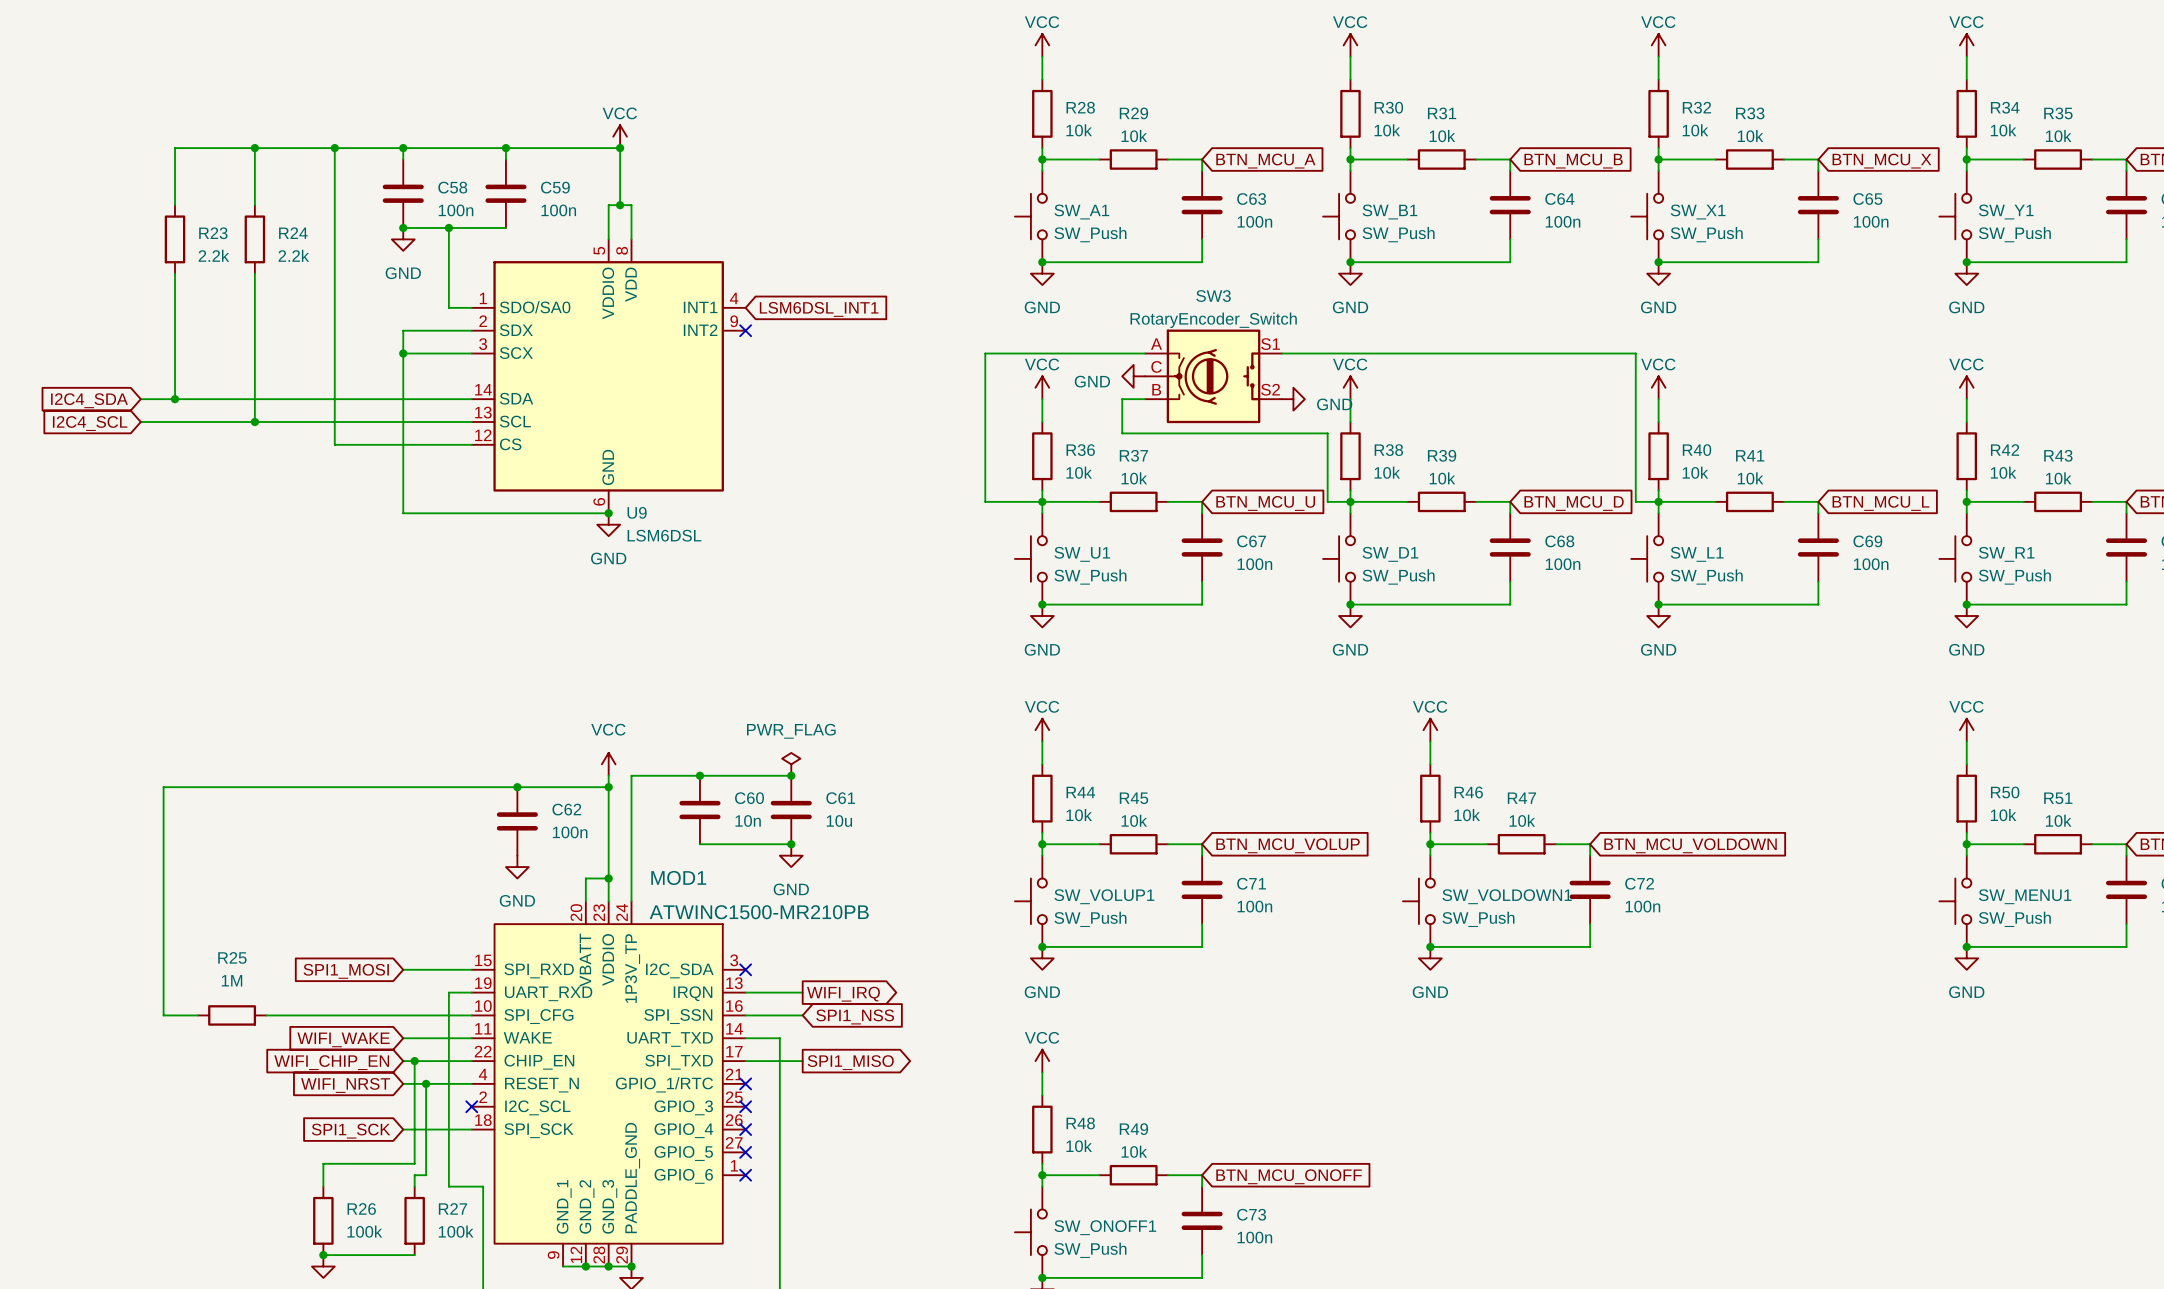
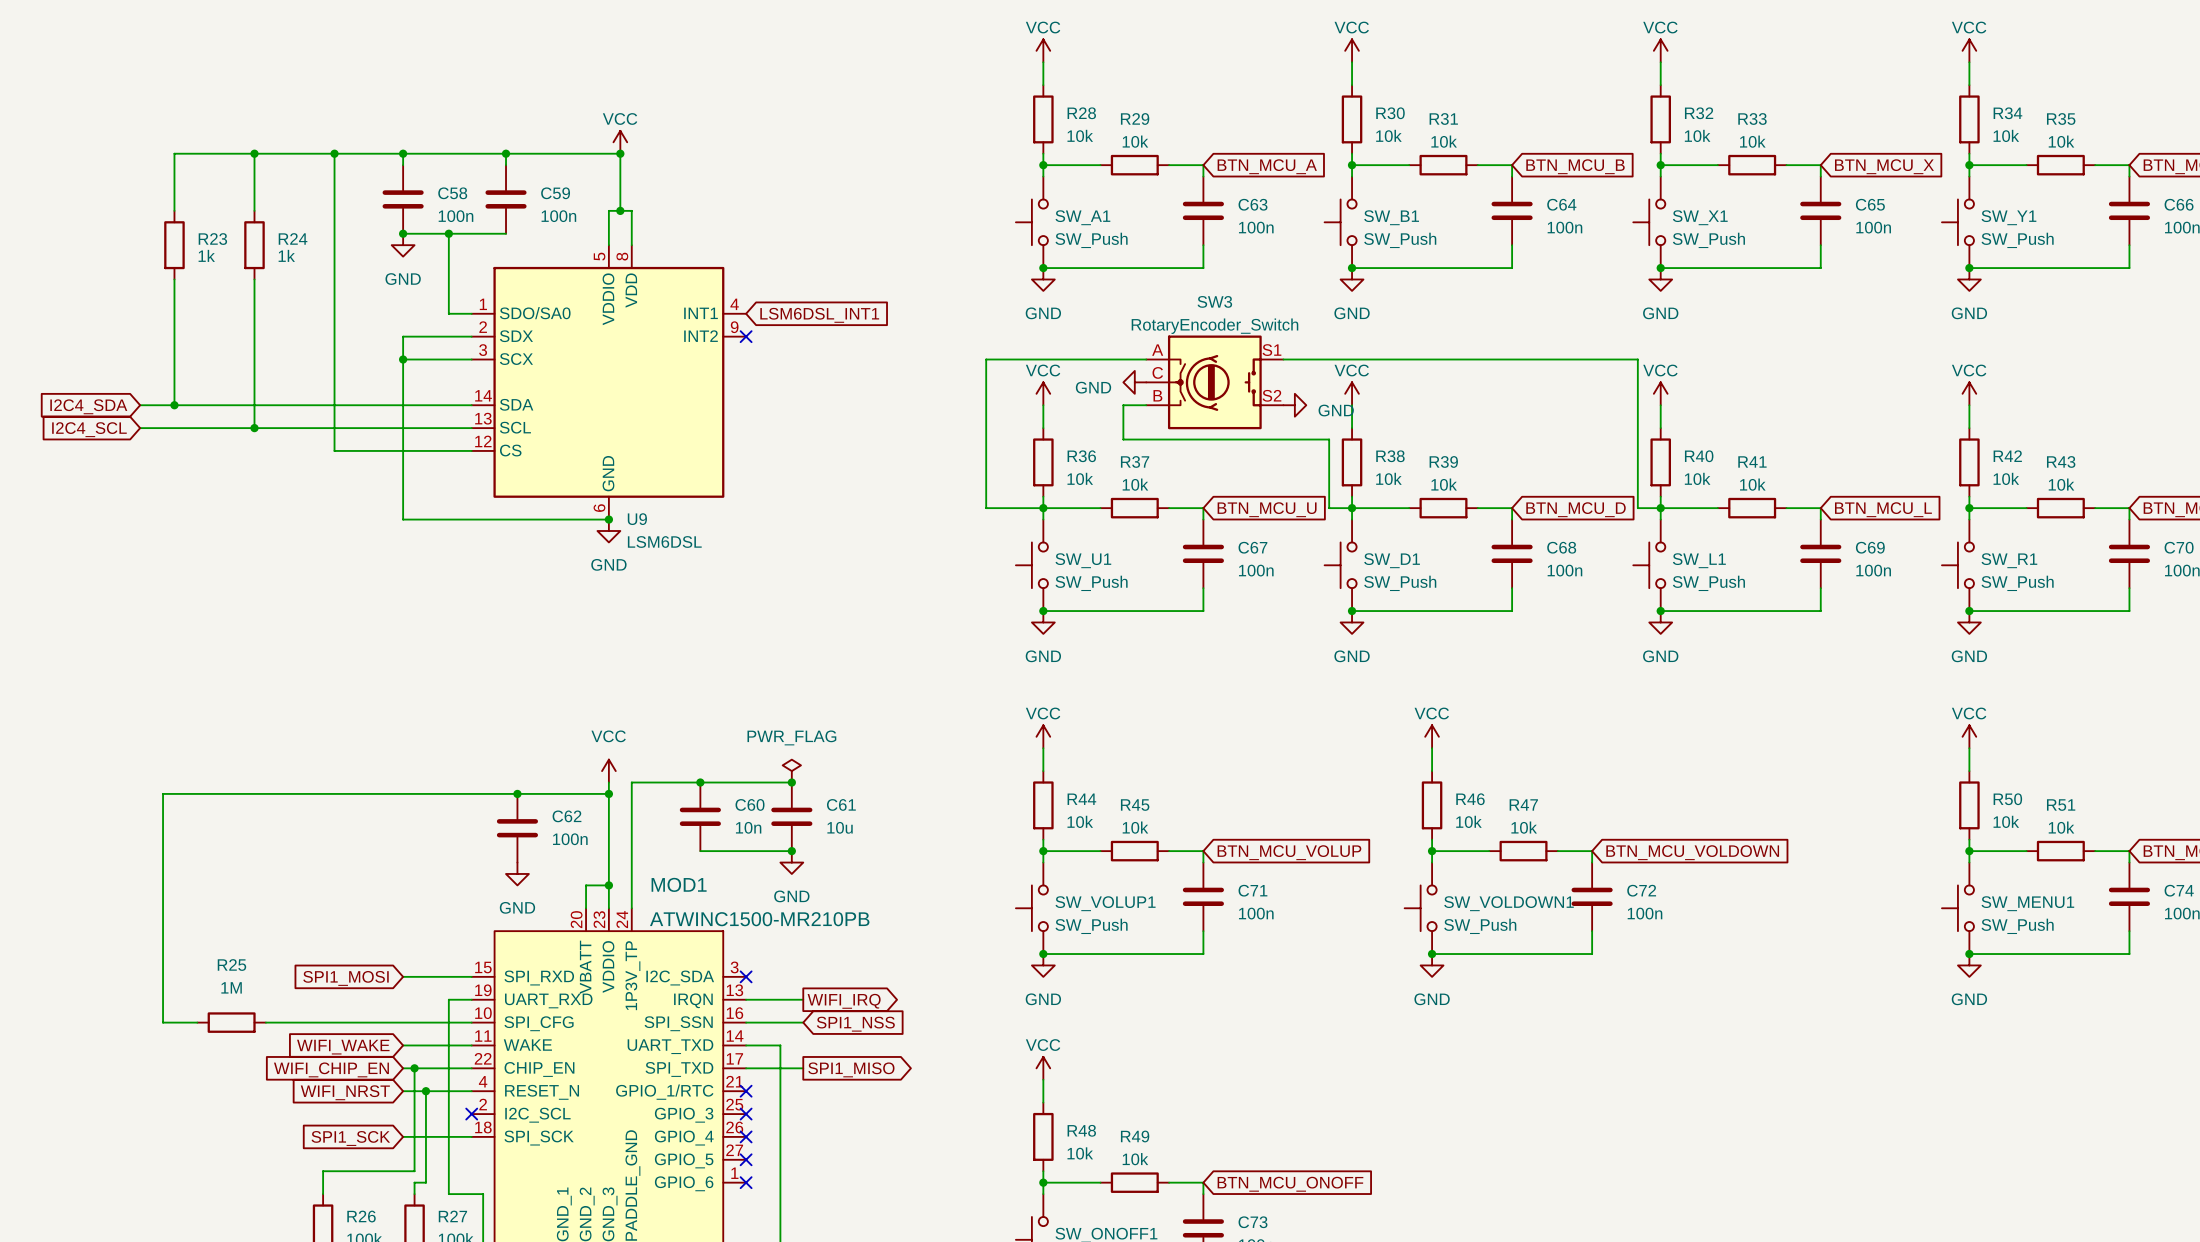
R23 value: 2.2k (213, 255) -> 1k (206, 255)
R24 value: 2.2k (293, 255) -> 1k (286, 255)

